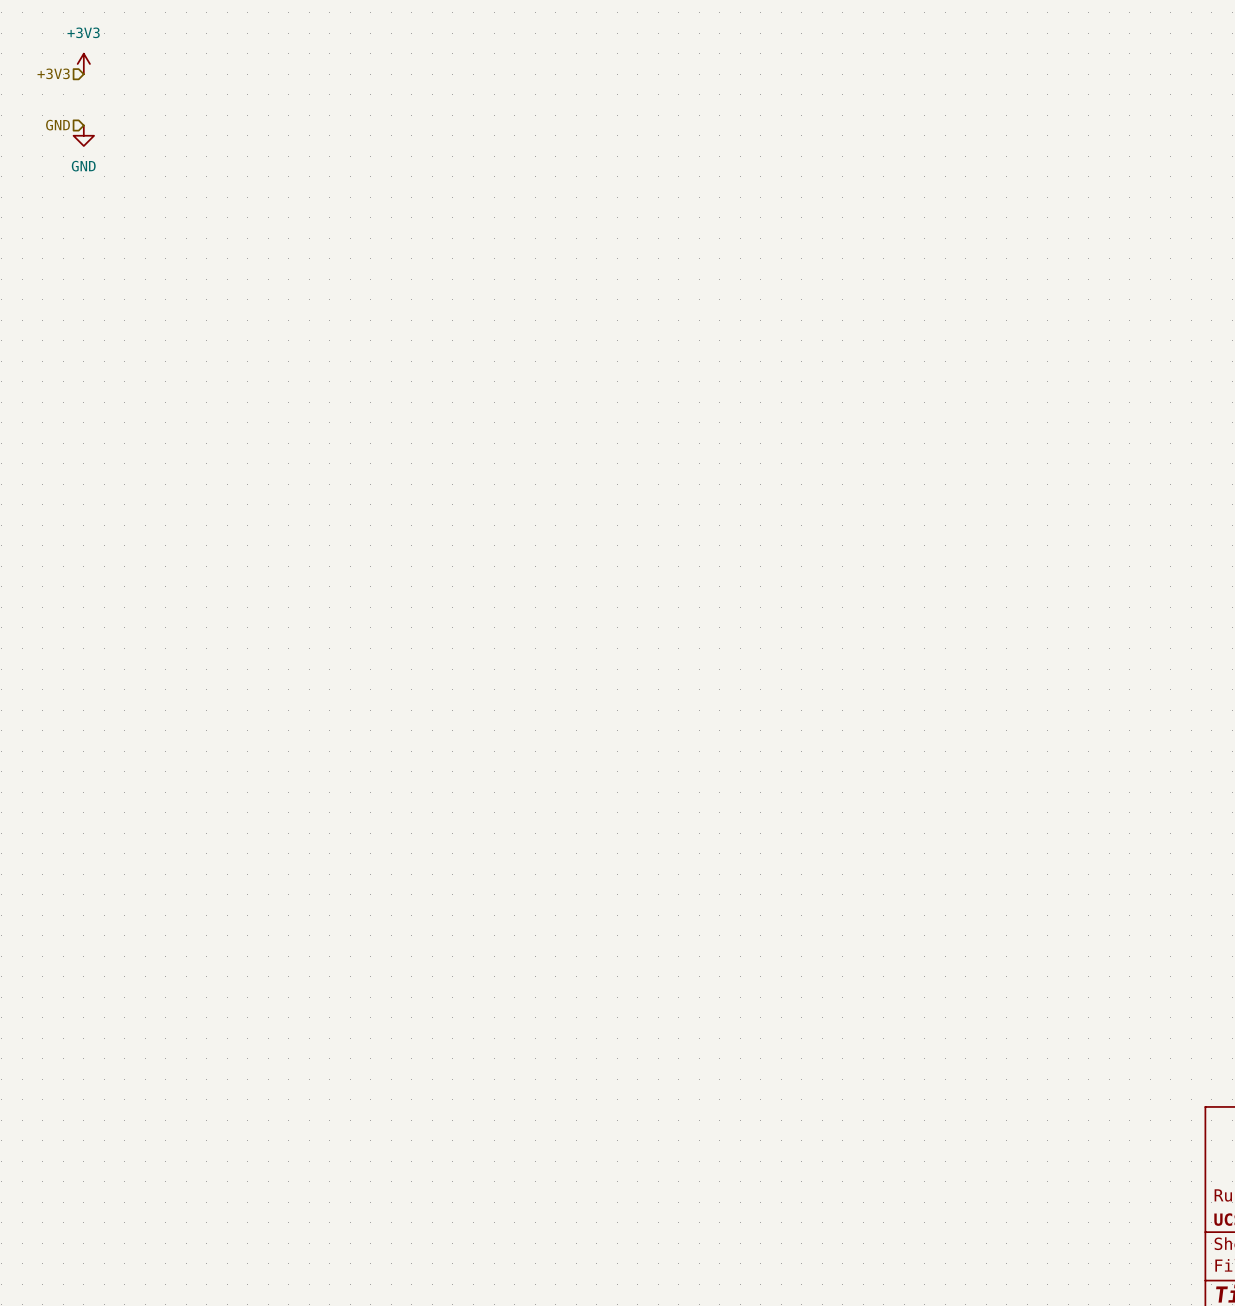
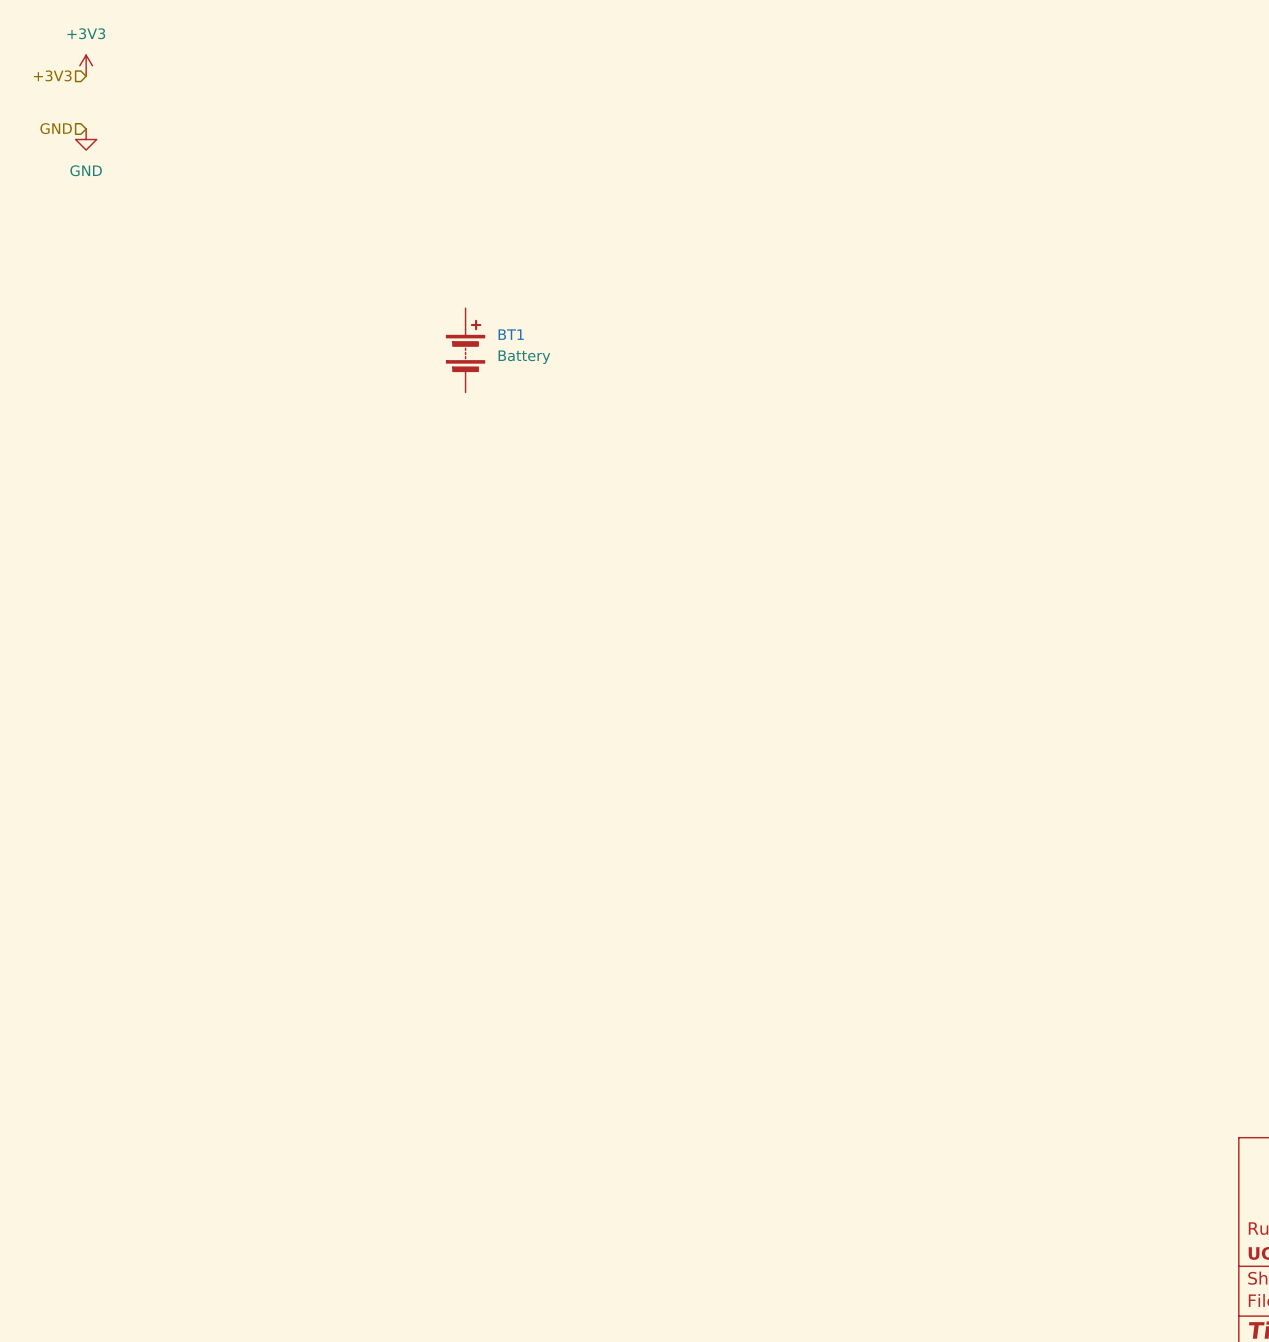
BT1: none -> Battery (465, 350)

